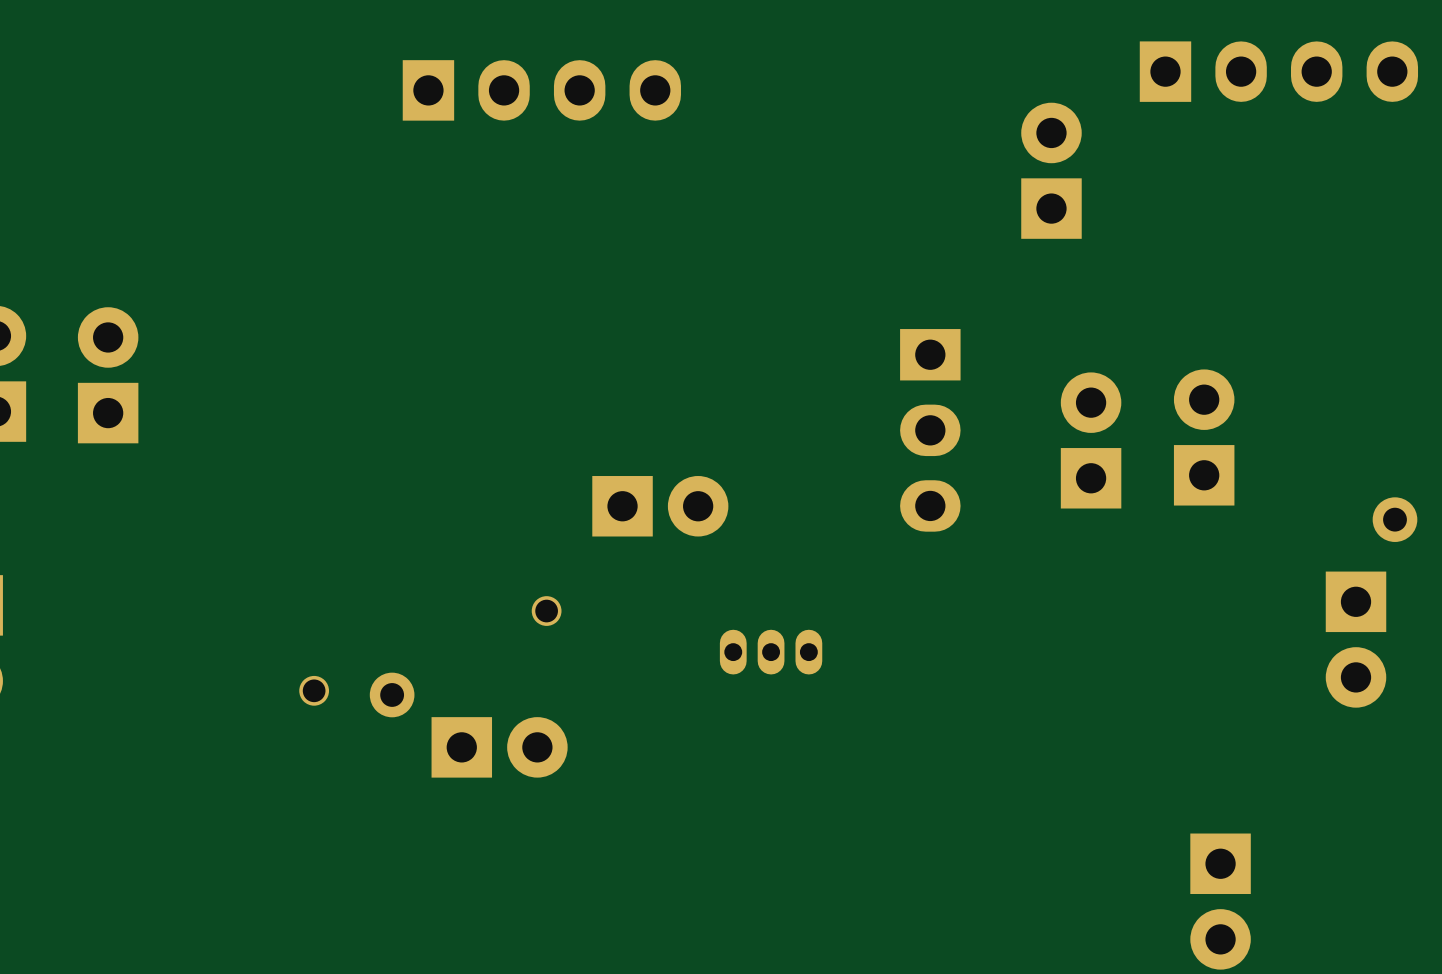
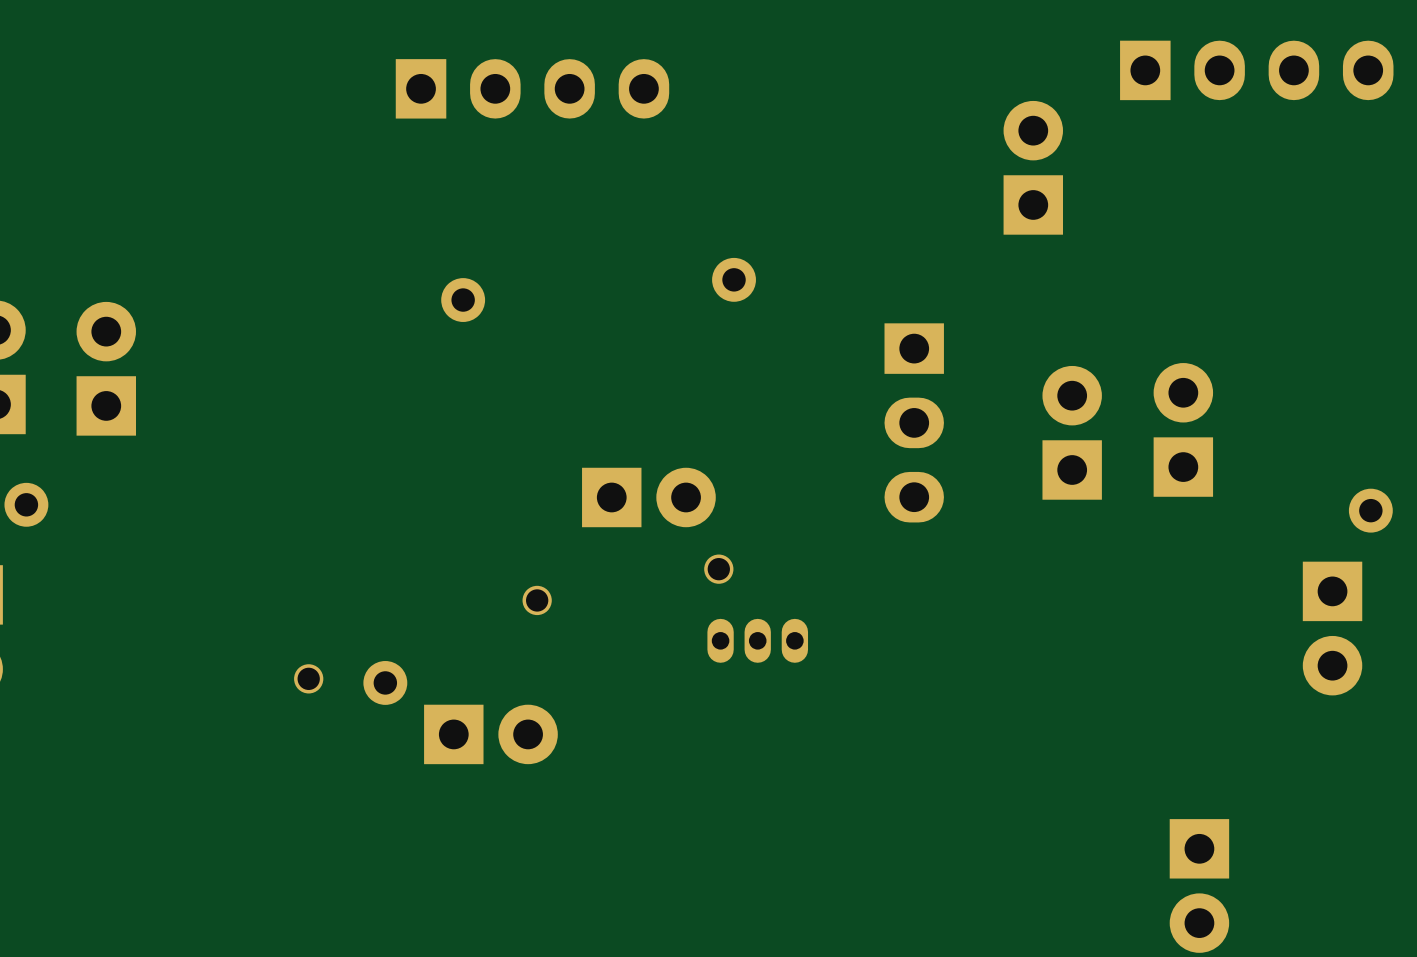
part: none -> (734, 279)
part: none -> (463, 300)
part: none -> (26, 504)
part: none -> (718, 569)

